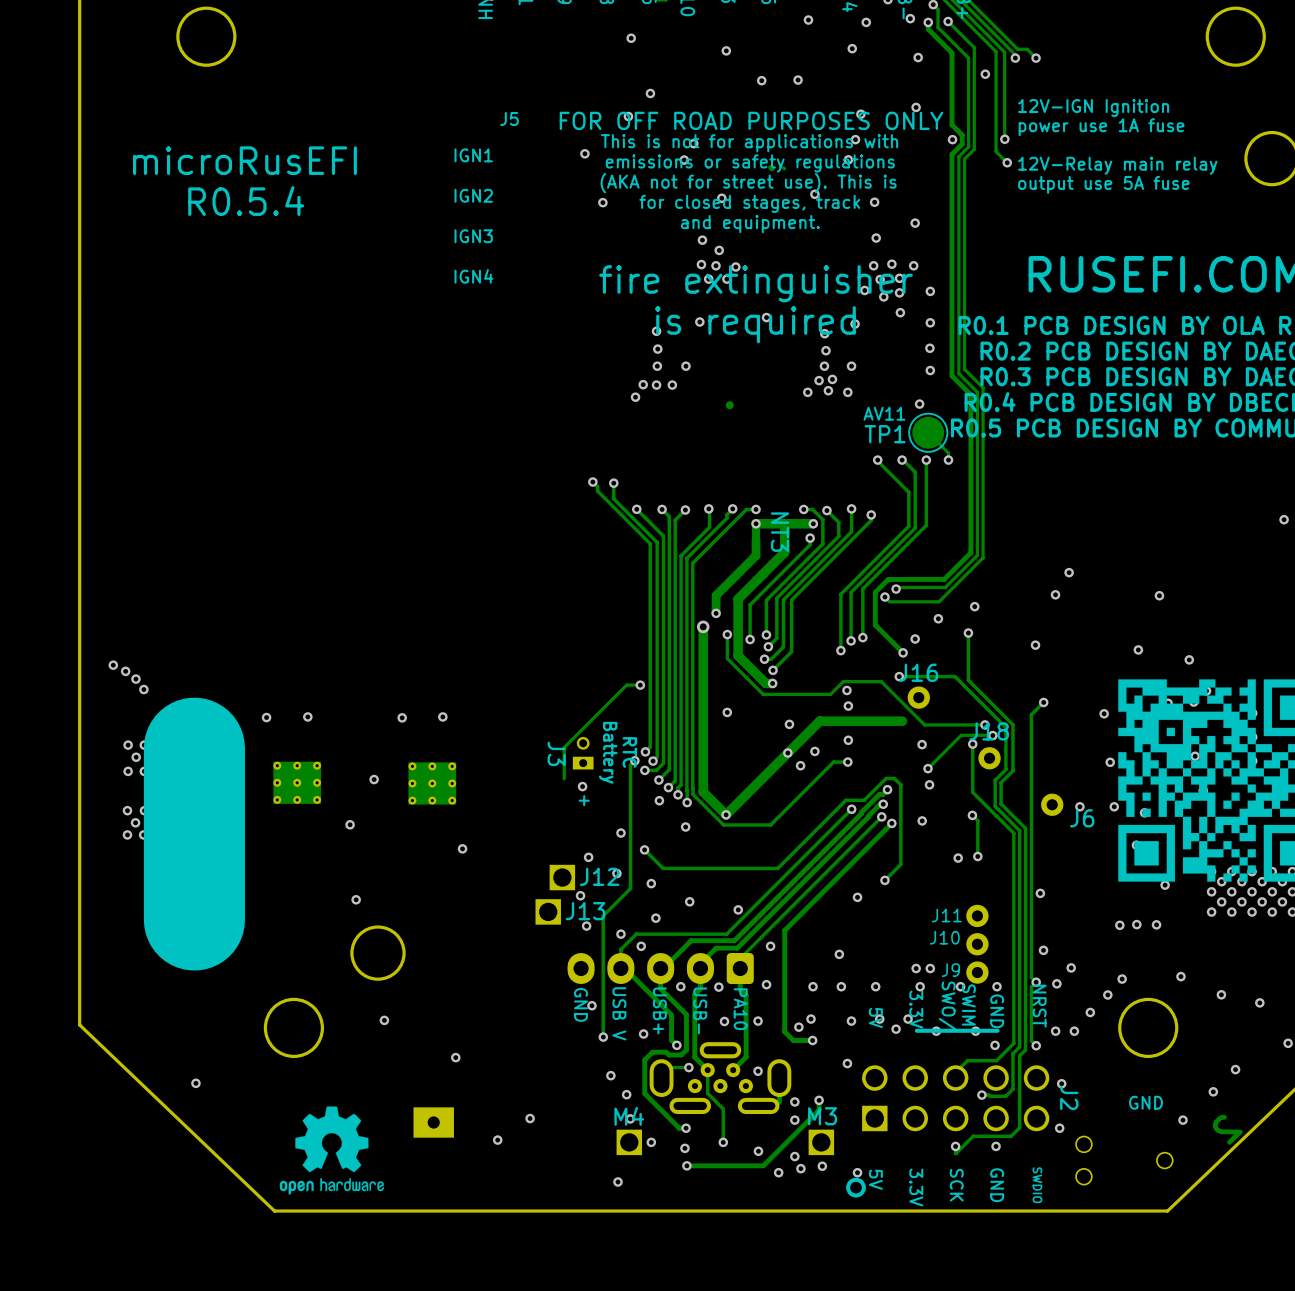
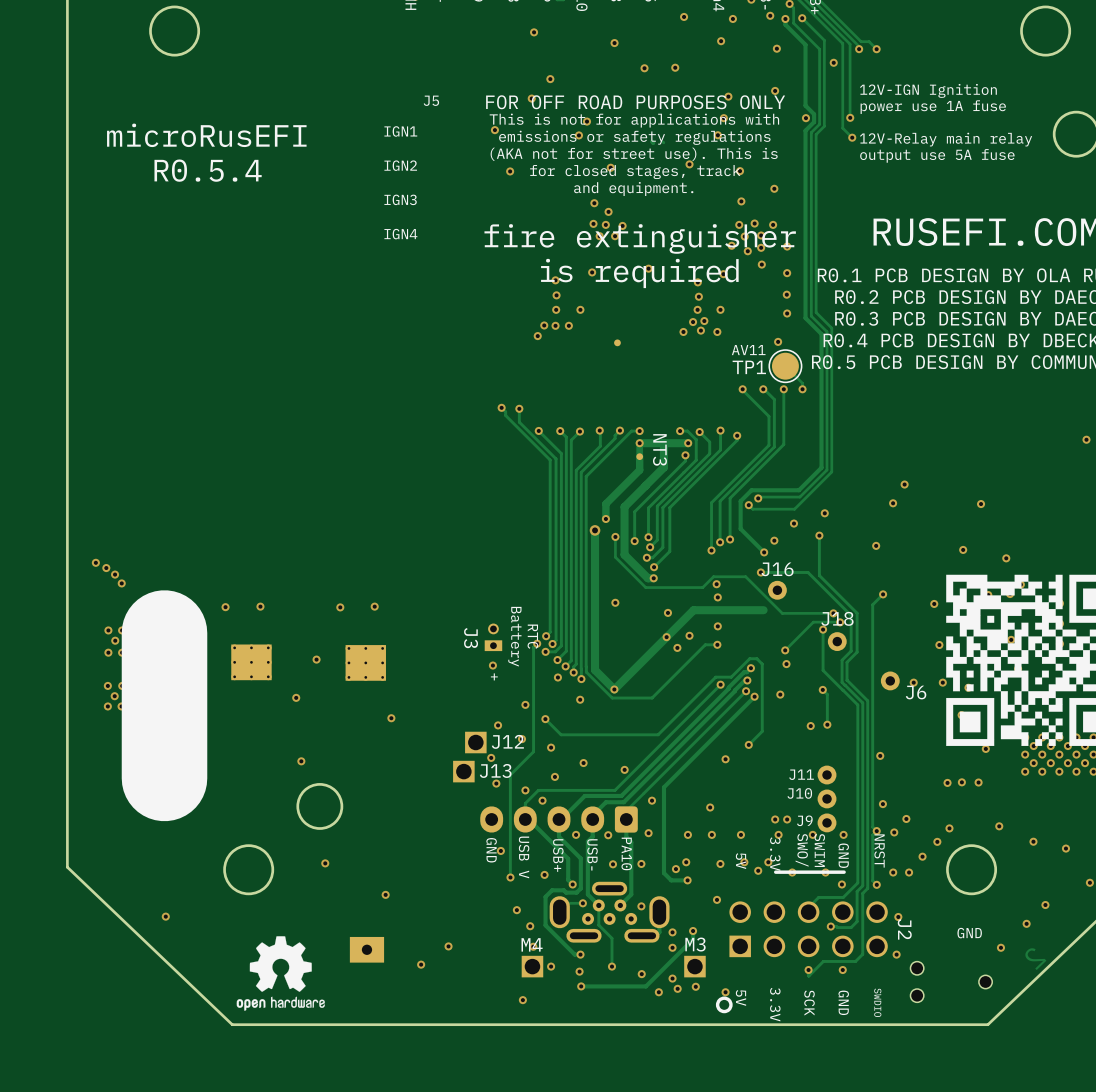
track: (640, 685) (626, 685) (564, 747) (564, 778) -> none
via: (640, 685) -> none
via: (922, 744) -> none

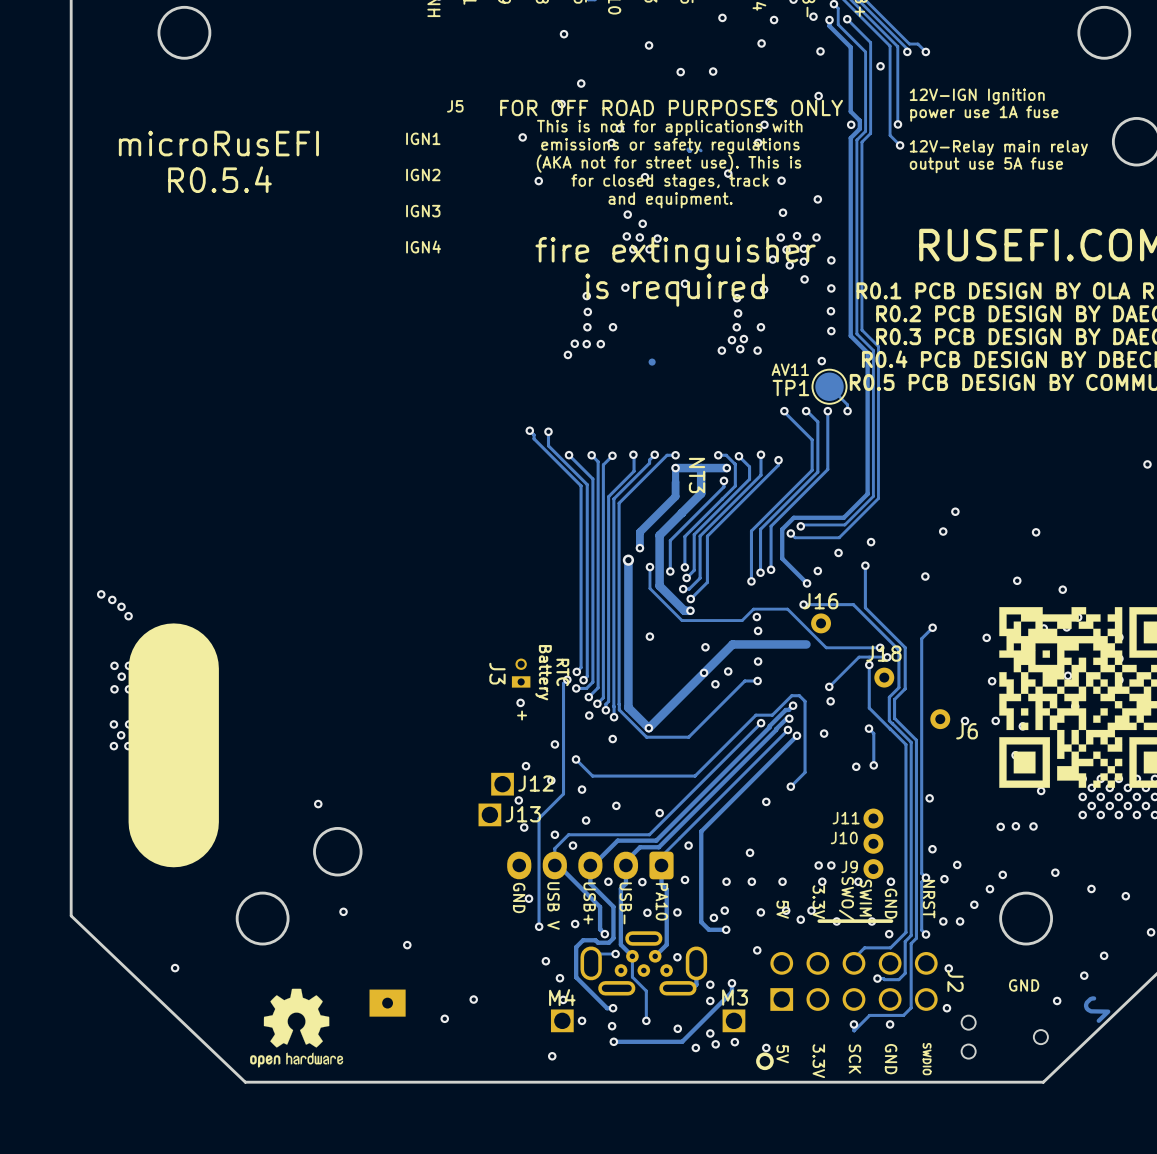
via: (260, 606) -> none
via: (374, 606) -> none
via: (225, 607) -> none
via: (340, 607) -> none
via: (316, 659) -> none
part: (251, 662) -> none
part: (365, 662) -> none
via: (296, 697) -> none
via: (391, 718) -> none

